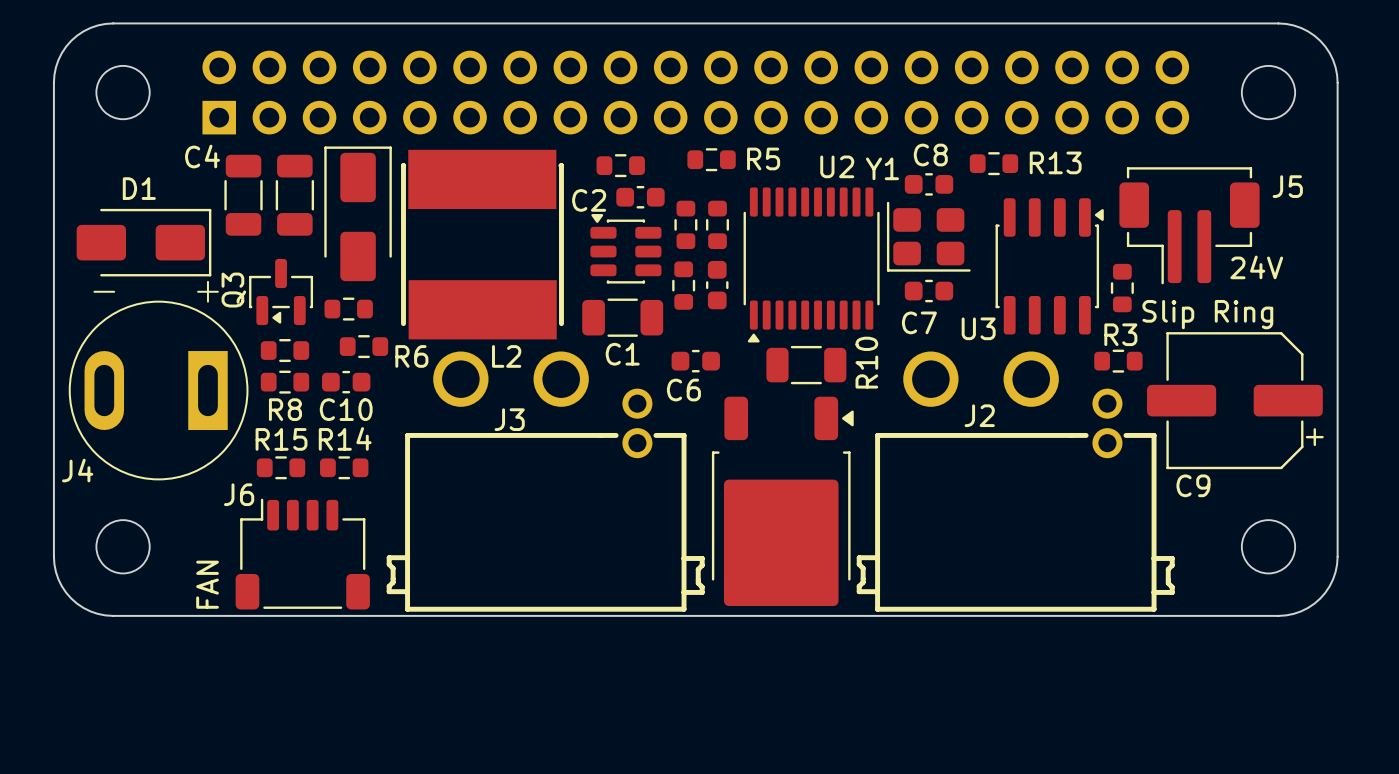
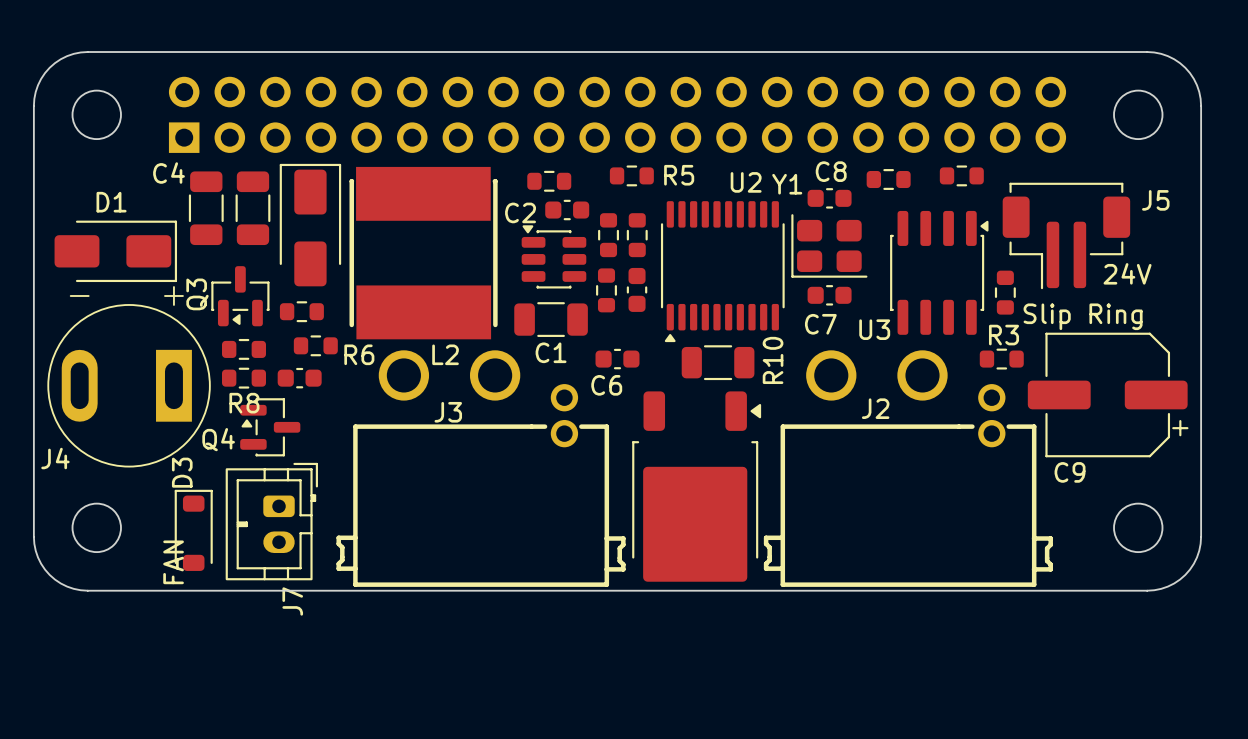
part: none -> (961, 175)
R13 name: R13 (1055, 162) -> none
C10 name: C10 (346, 409) -> none
Q4: none -> (270, 427)
R15: (281, 467) -> none
R14: (344, 467) -> none
J7: none -> (271, 521)
D3: none -> (193, 530)
J6: (302, 554) -> none

